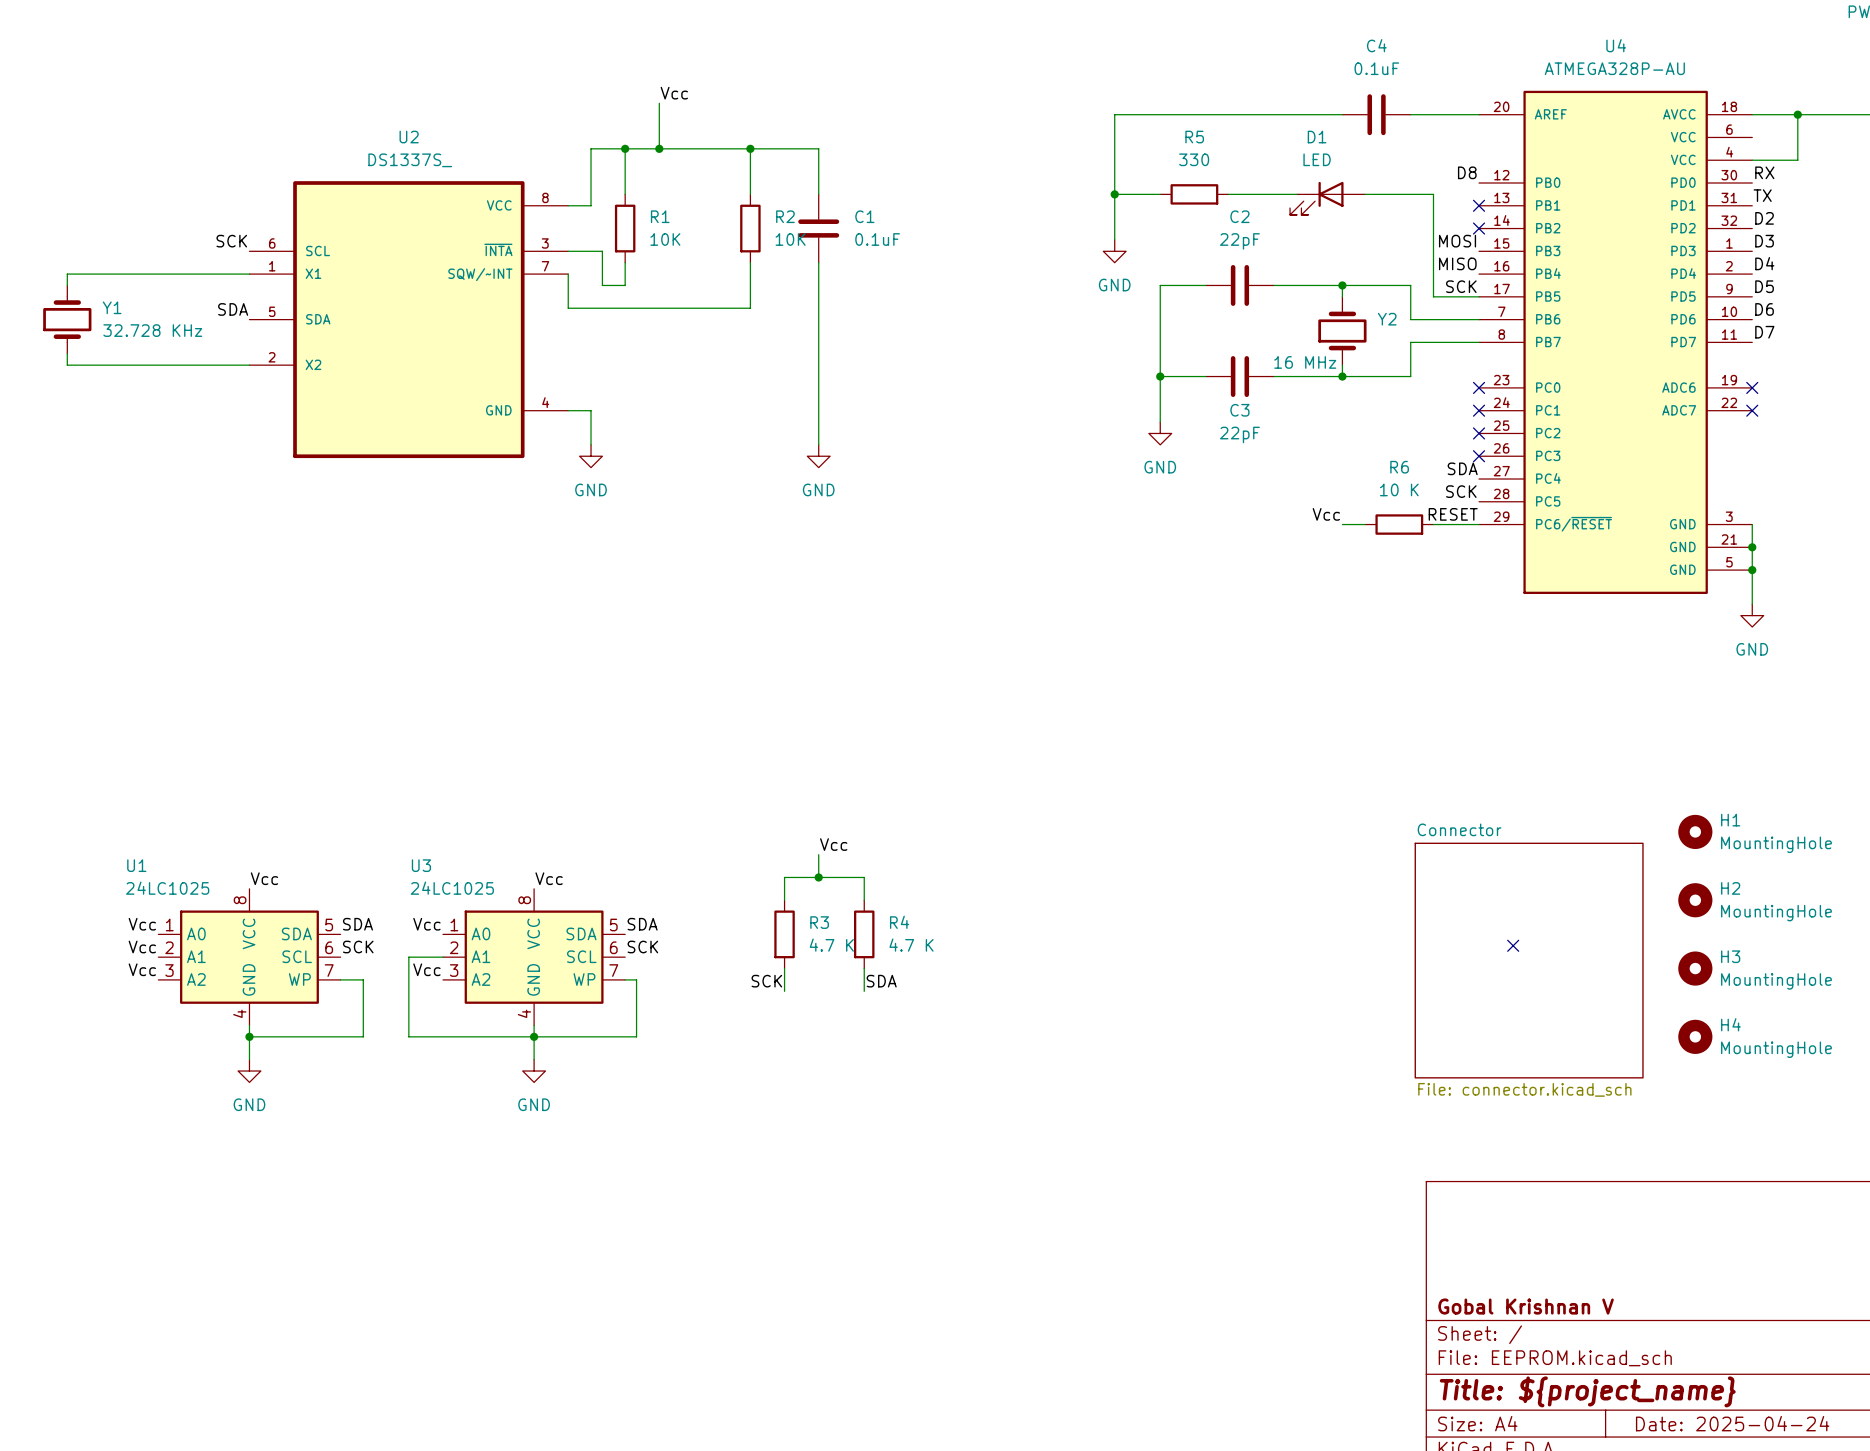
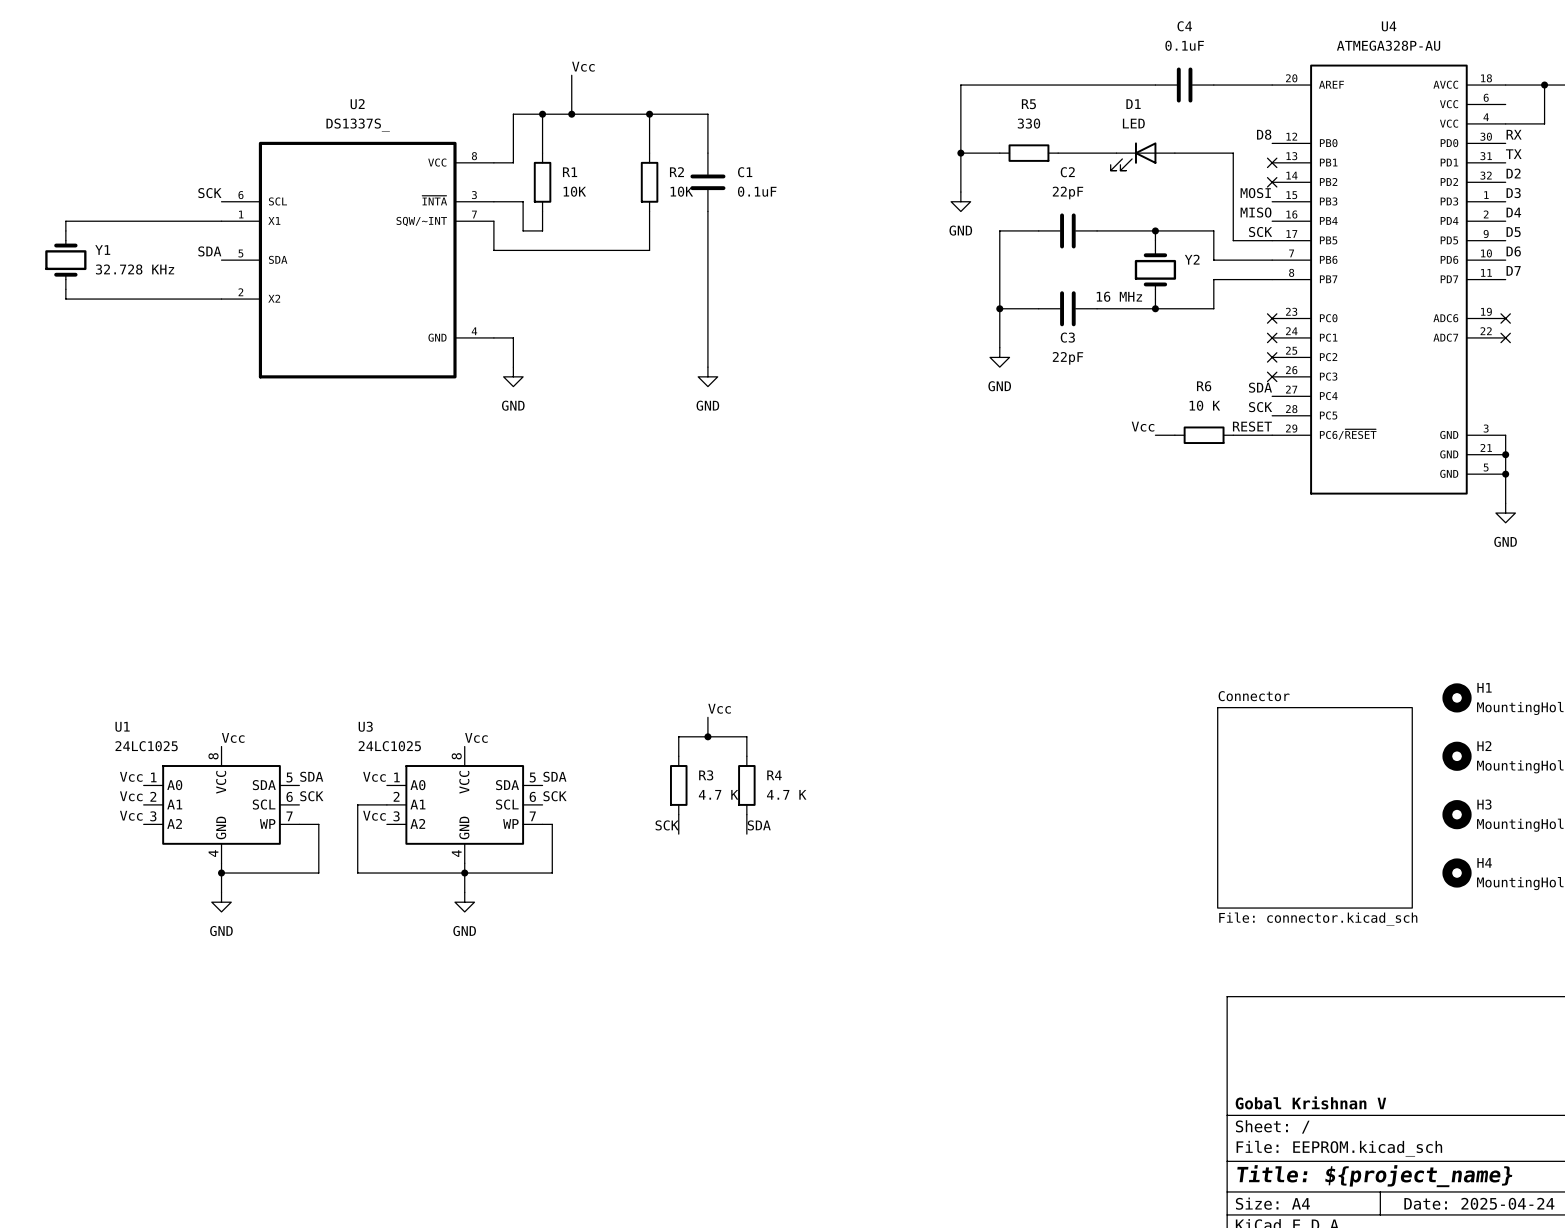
no-connect mark: (1513, 945) -> none

